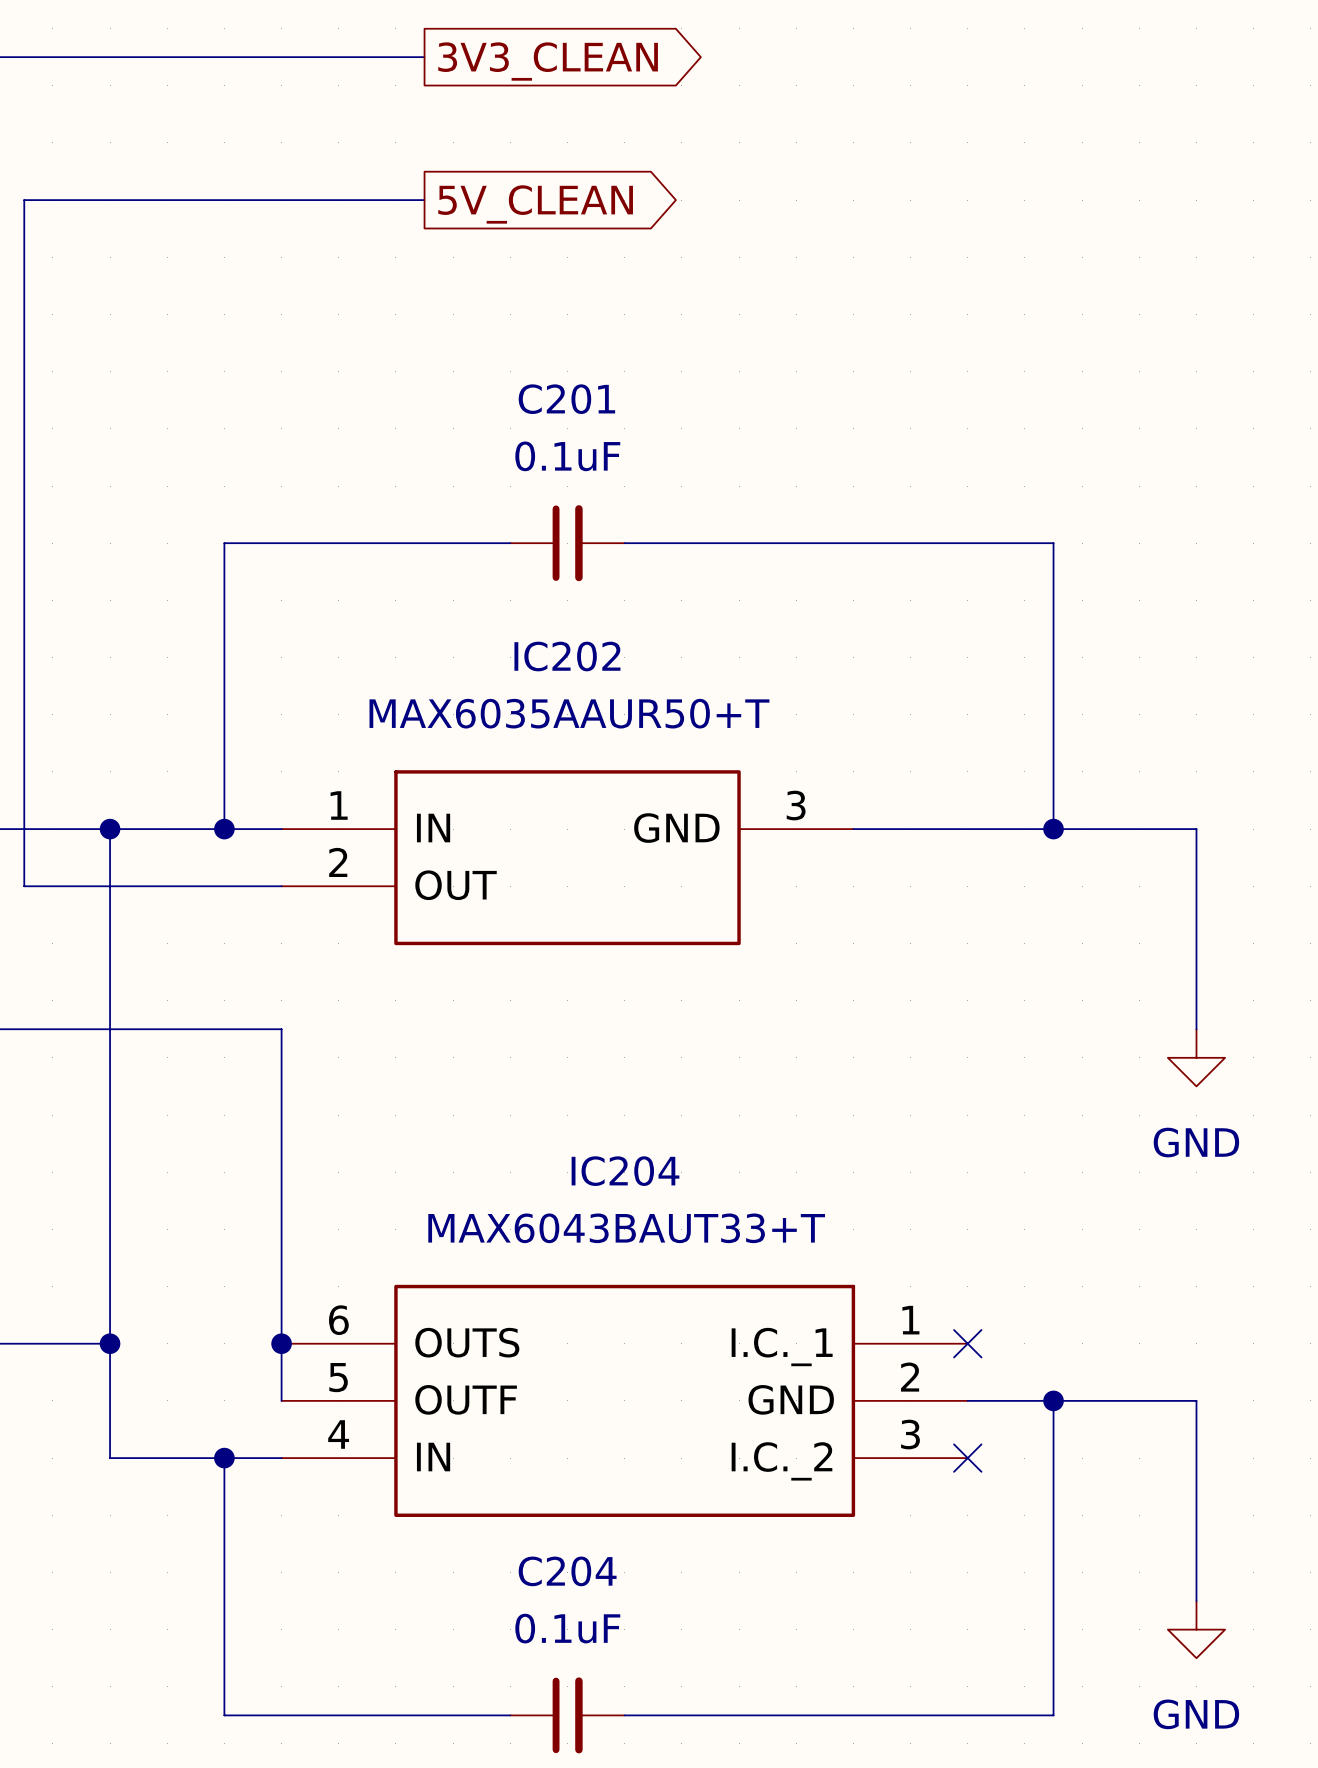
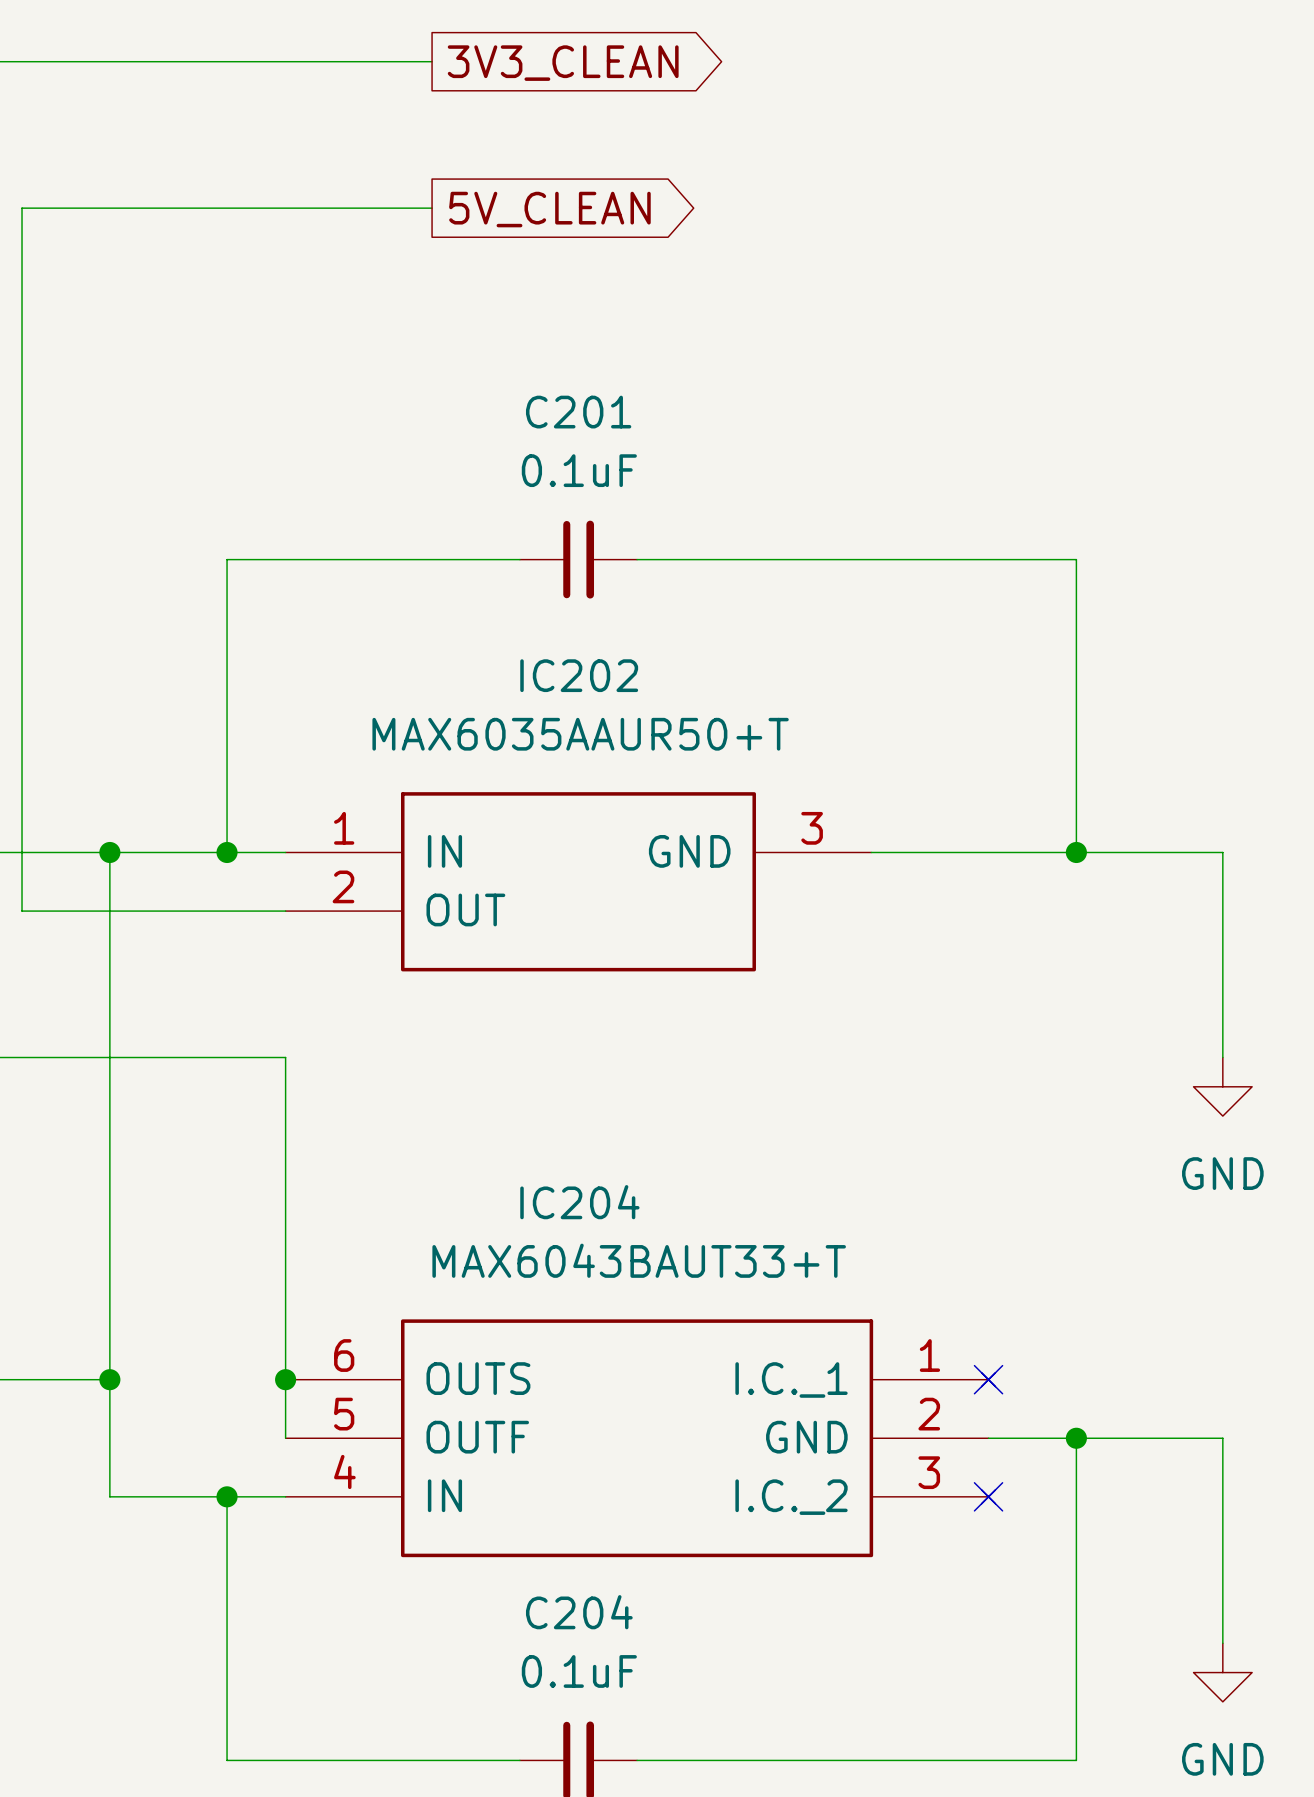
IC204 name position: IC204 (625, 1171) -> IC204 (579, 1202)
IC204 symbol: [281, 1284, 968, 1517] -> [285, 1319, 996, 1558]

